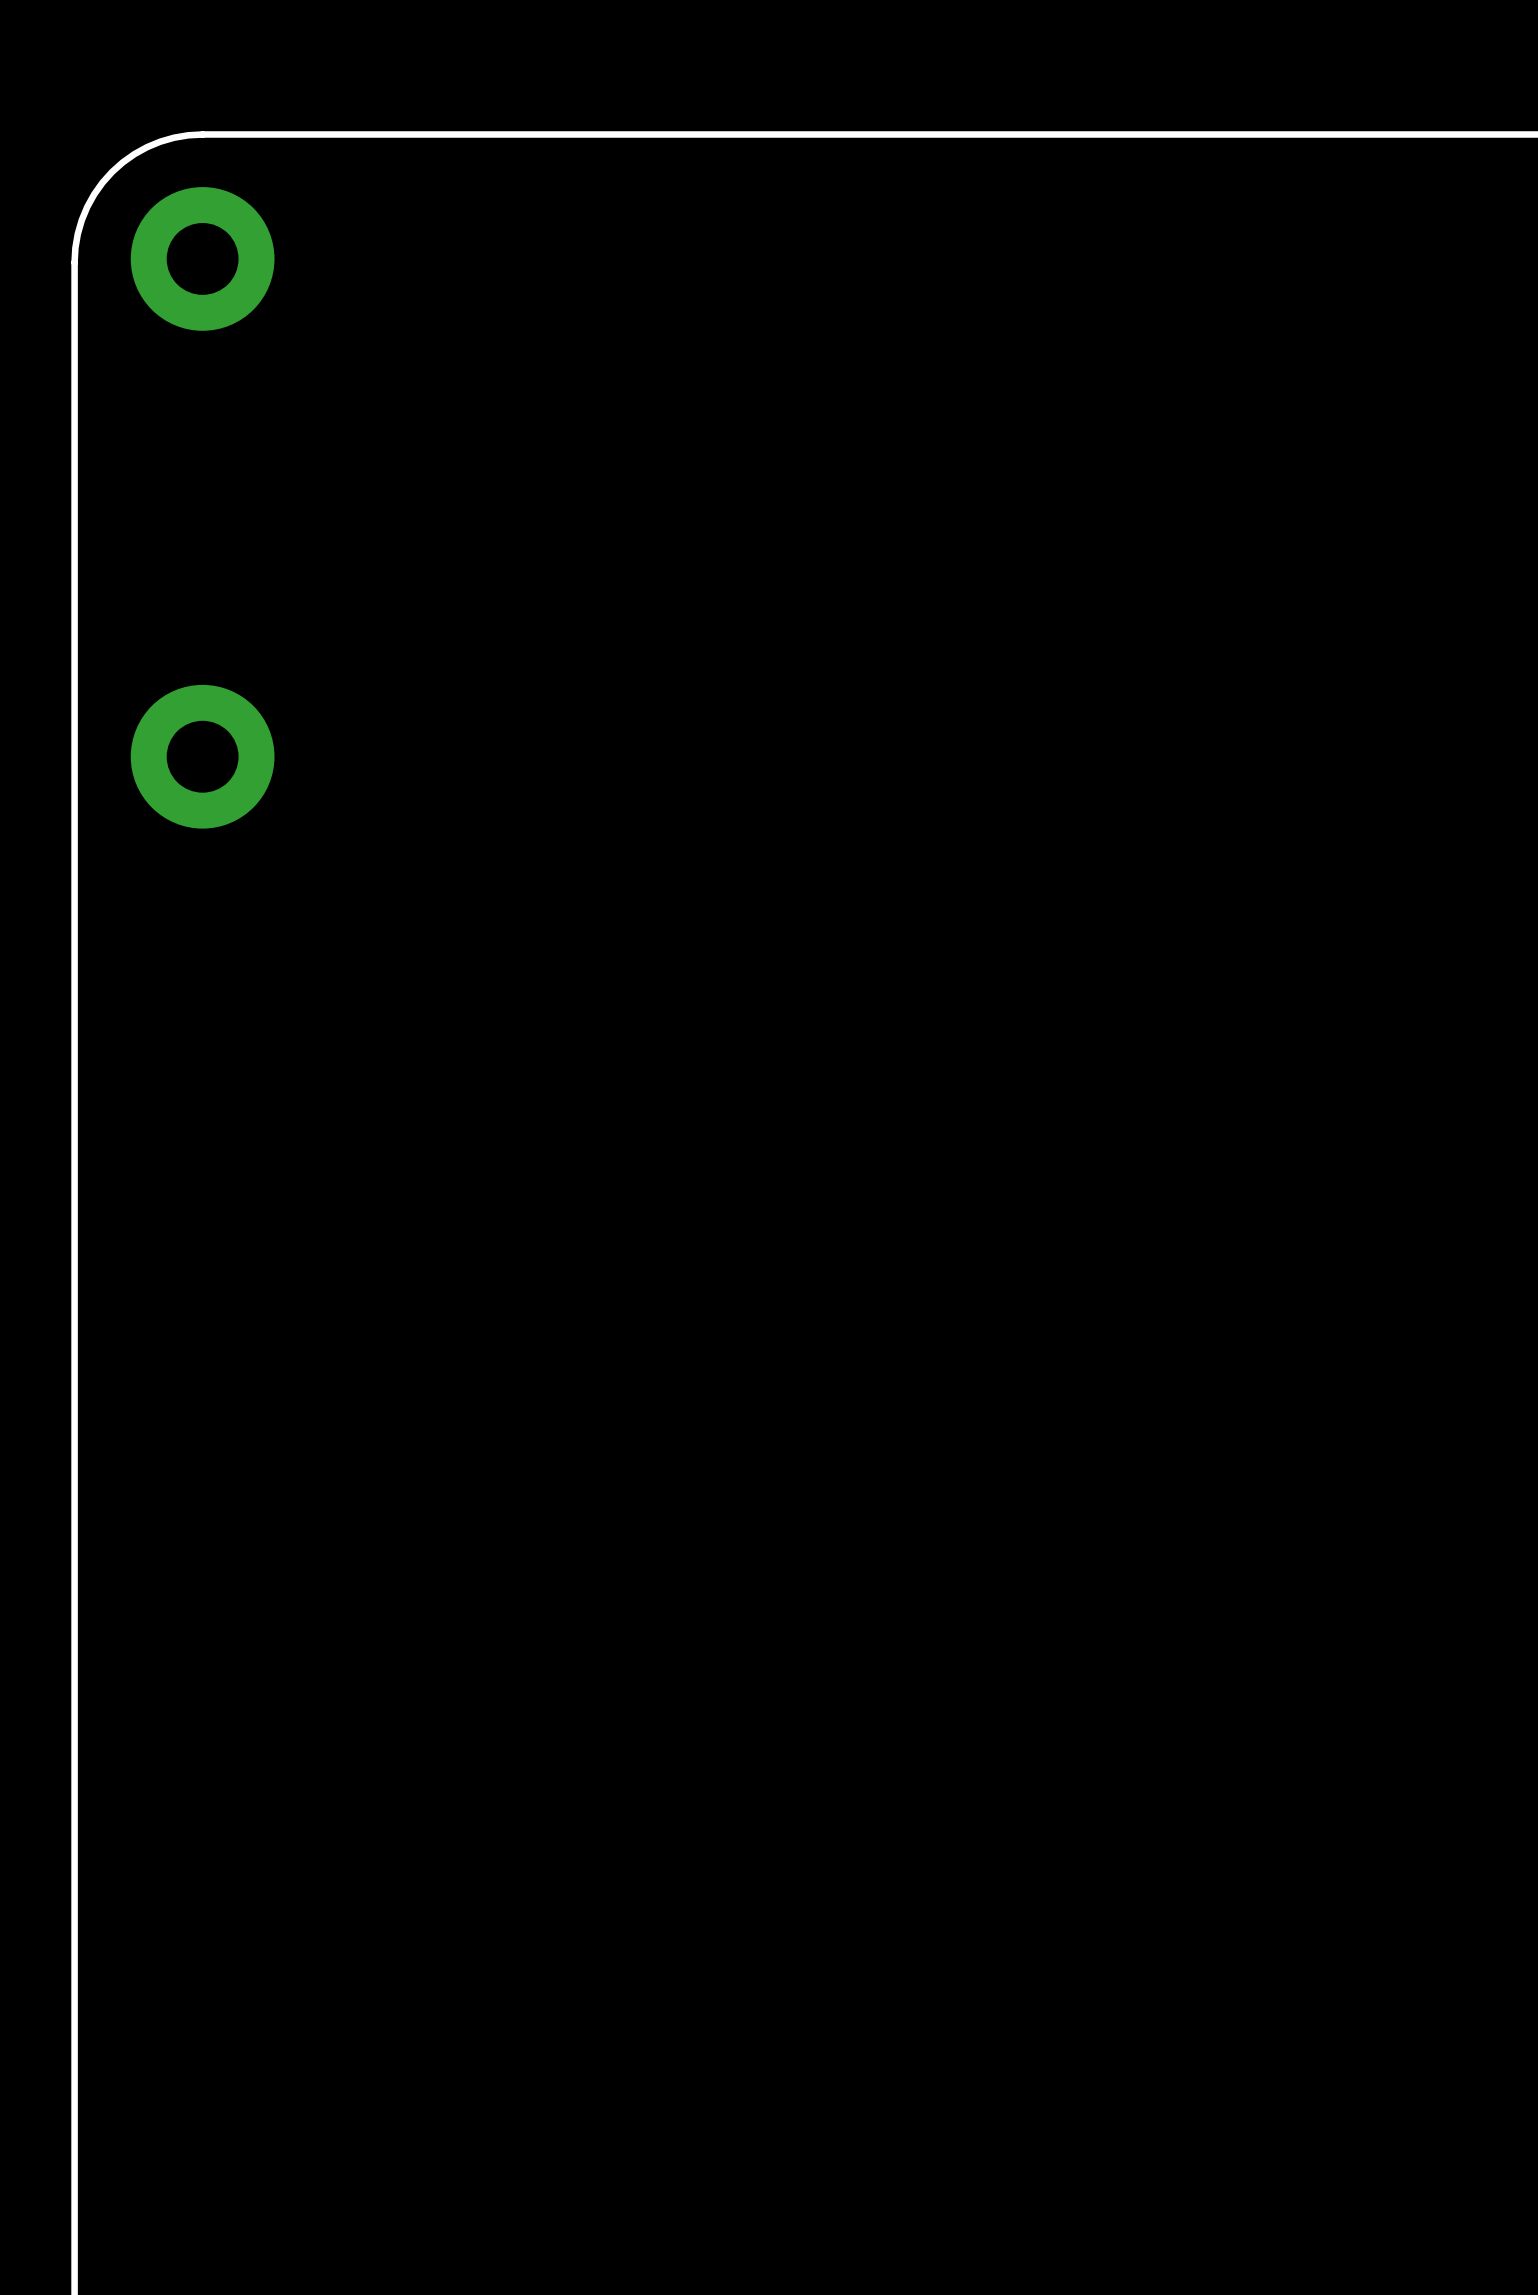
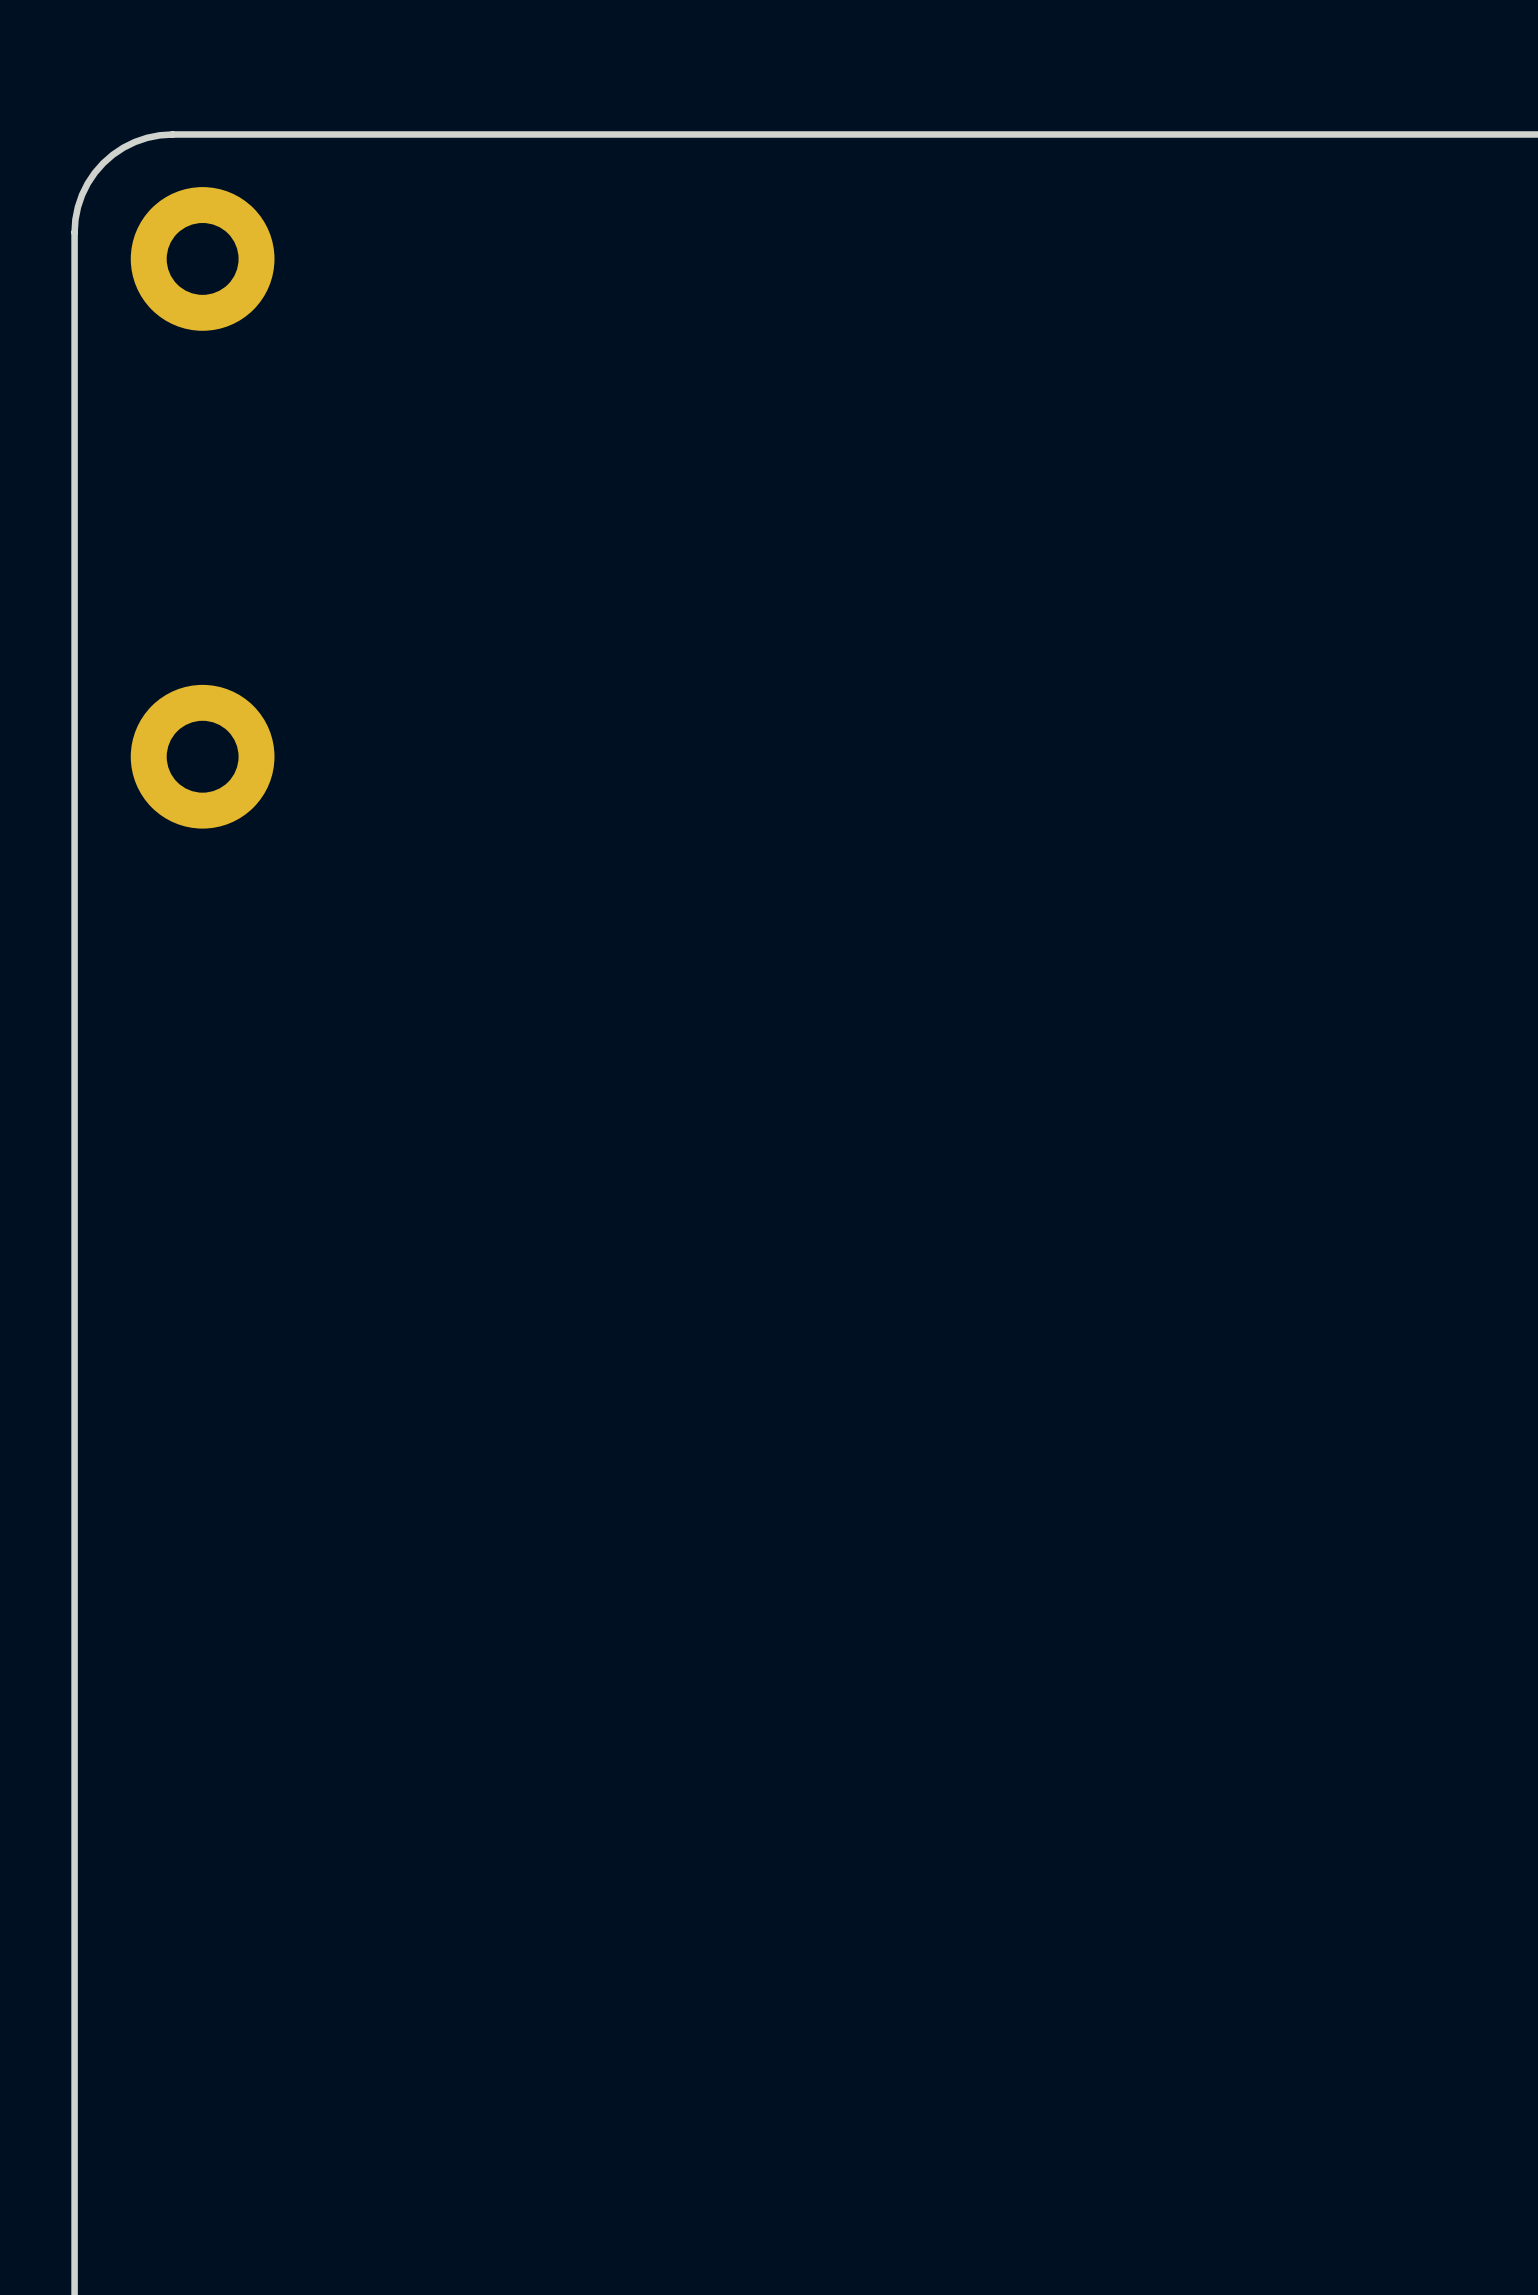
board edge: (202, 134) (188, 135) (160, 141) (134, 154) (112, 171) (94, 194) (87, 206) (77, 234) (74, 262) -> (202, 134) (172, 134) (147, 137) (123, 147) (103, 163) (87, 183) (77, 207) (74, 232) (74, 262)

